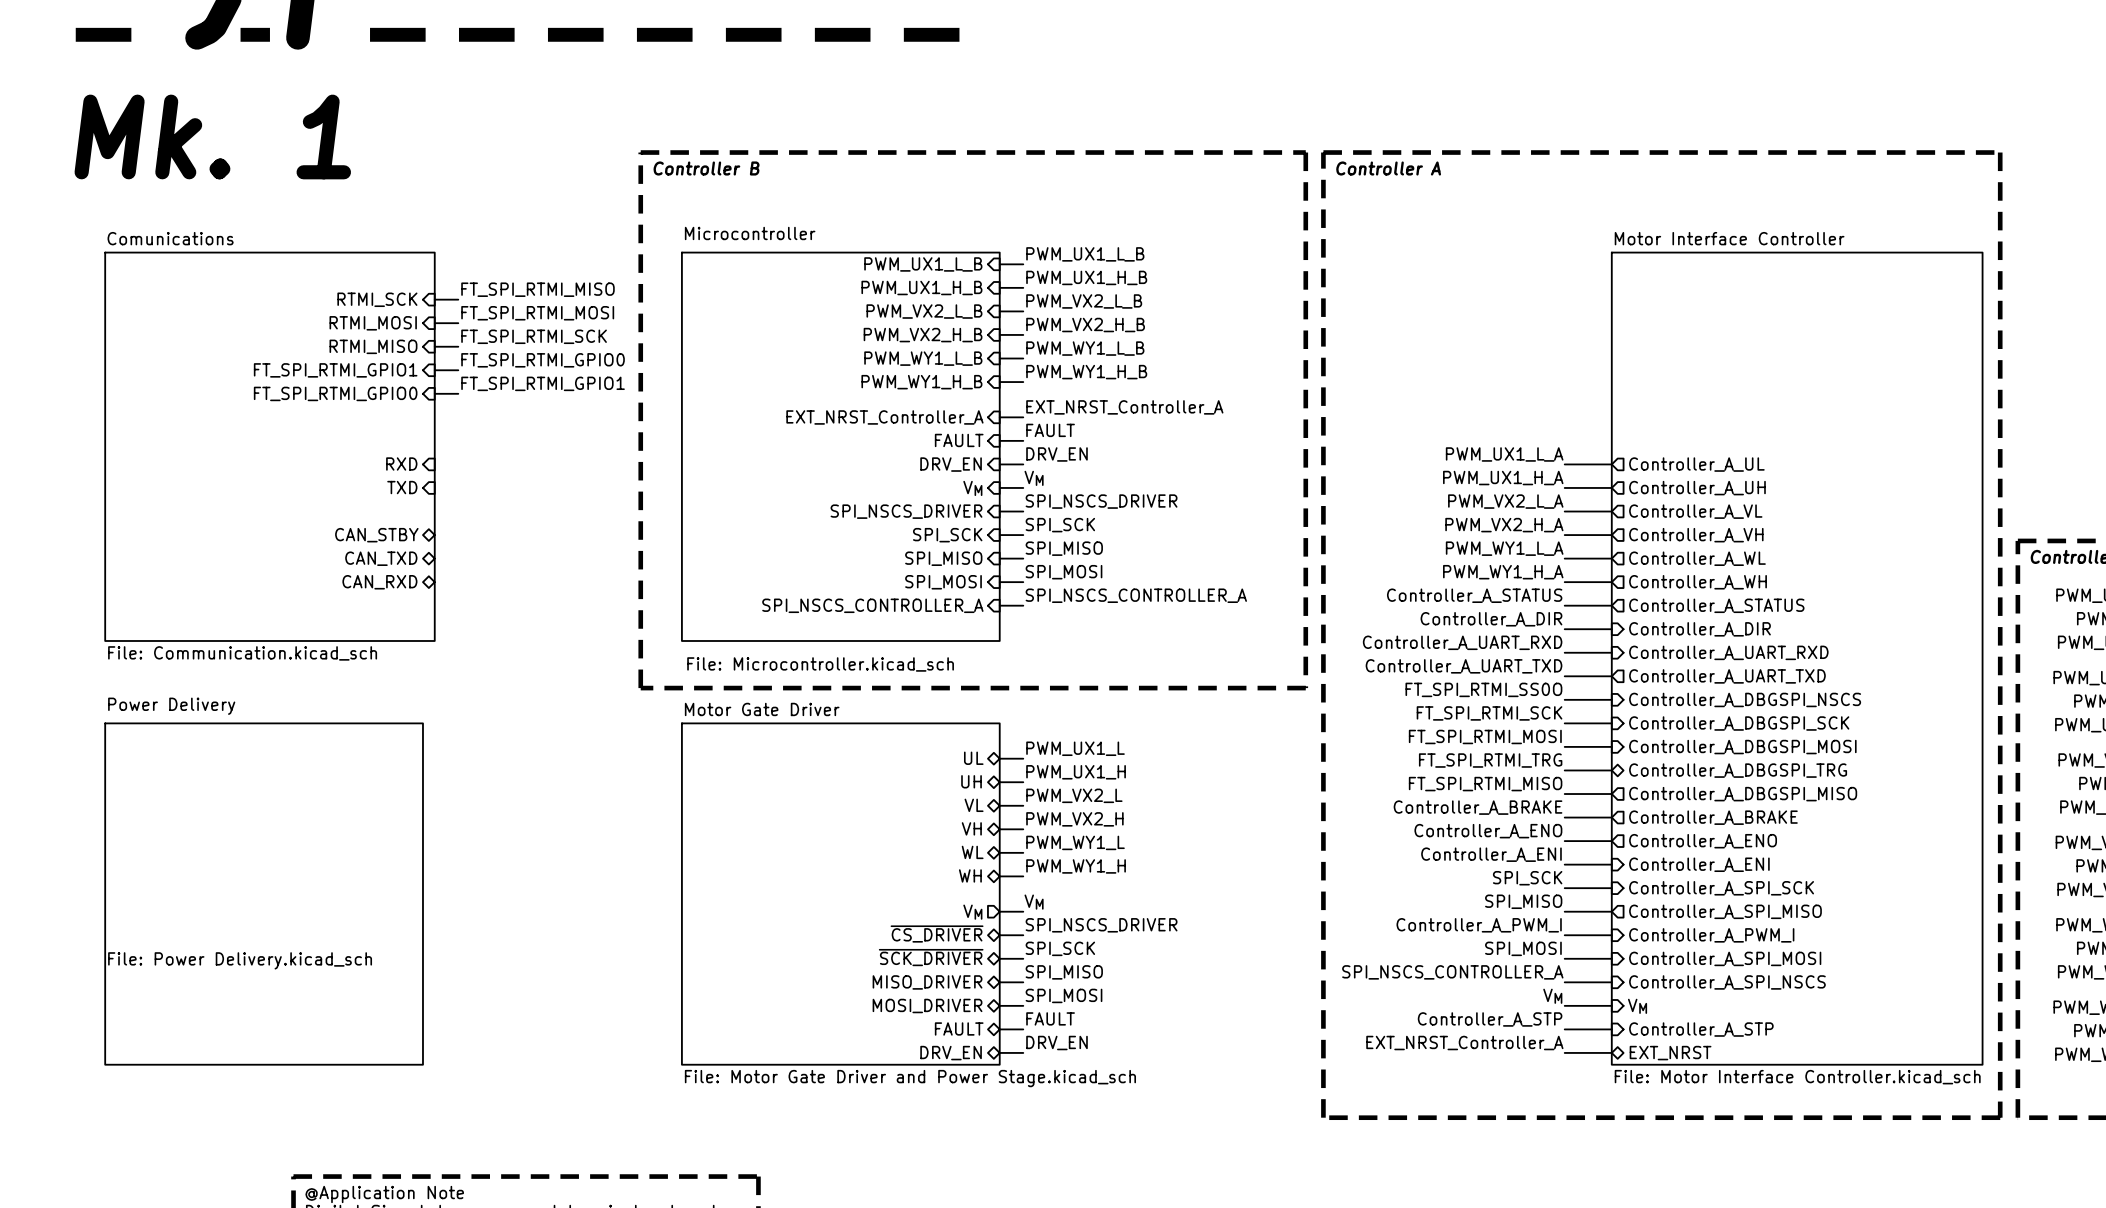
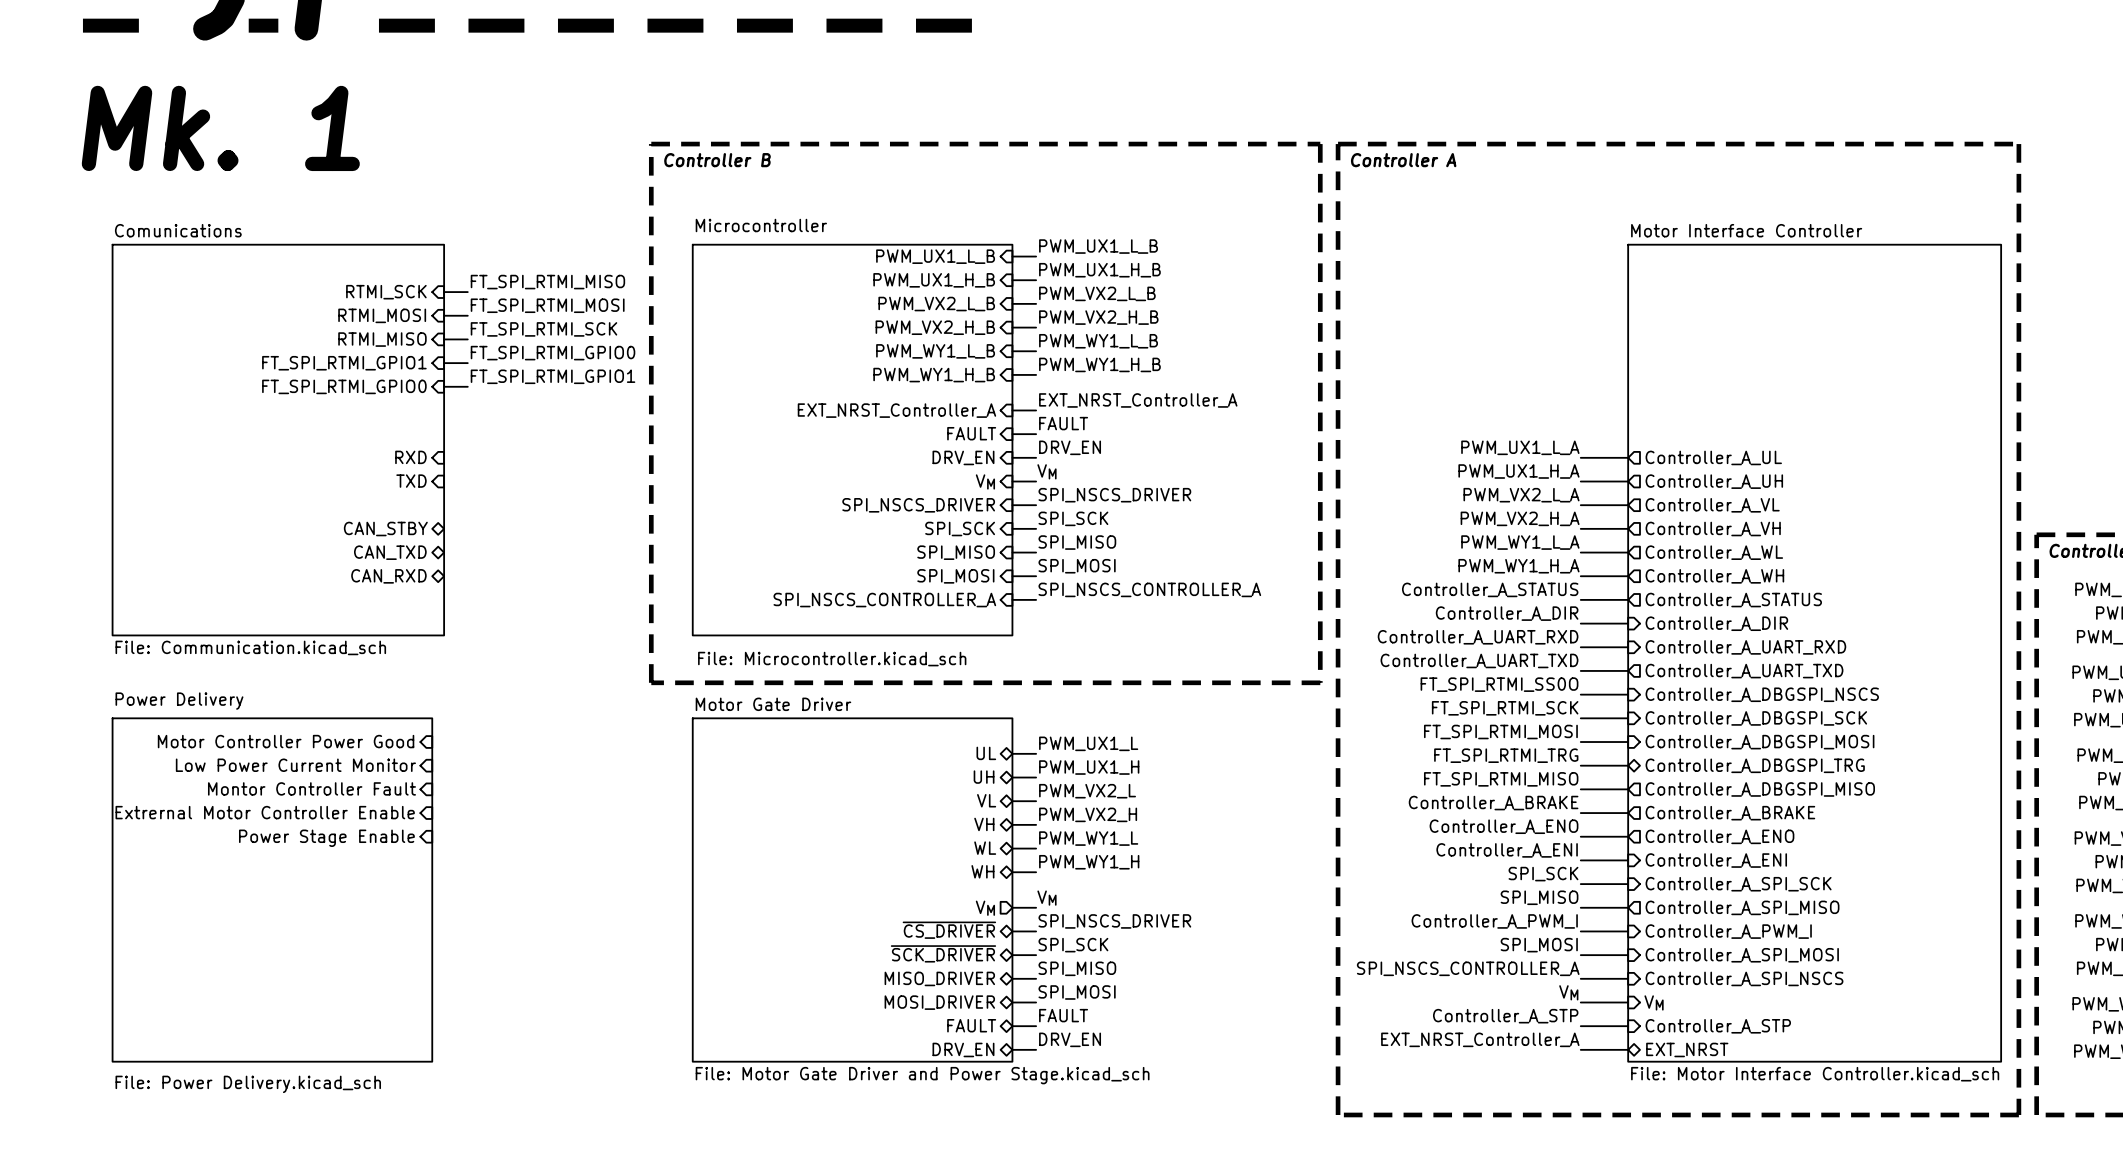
sheet pin: none -> Motor Controller Power Good (286, 741)
sheet pin: none -> Low Power Current Monitor (295, 765)
sheet pin: none -> Montor Controller Fault (311, 788)
sheet pin: none -> Extrernal Motor Controller Enable (265, 812)
sheet pin: none -> Power Stage Enable (326, 838)
sheet Power Delivery value position: File: Power Delivery.kicad_sch (240, 960) -> File: Power Delivery.kicad_sch (248, 1084)

